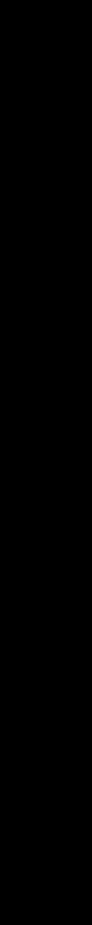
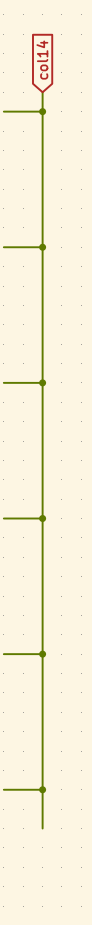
global label: none -> col14 (42, 60)
wire: none -> (42, 92) (42, 828)
wire: none -> (3, 111) (42, 111)
junction: none -> (42, 111)
wire: none -> (3, 247) (42, 247)
junction: none -> (42, 247)
wire: none -> (3, 382) (42, 382)
junction: none -> (42, 382)
wire: none -> (3, 518) (42, 518)
junction: none -> (42, 518)
wire: none -> (3, 654) (42, 654)
junction: none -> (42, 654)
wire: none -> (3, 789) (42, 789)
junction: none -> (42, 789)

